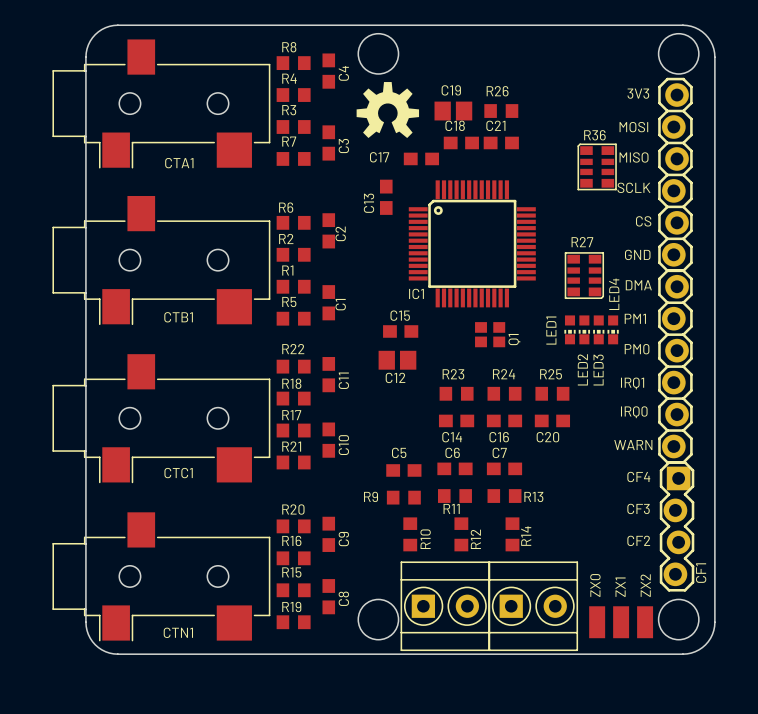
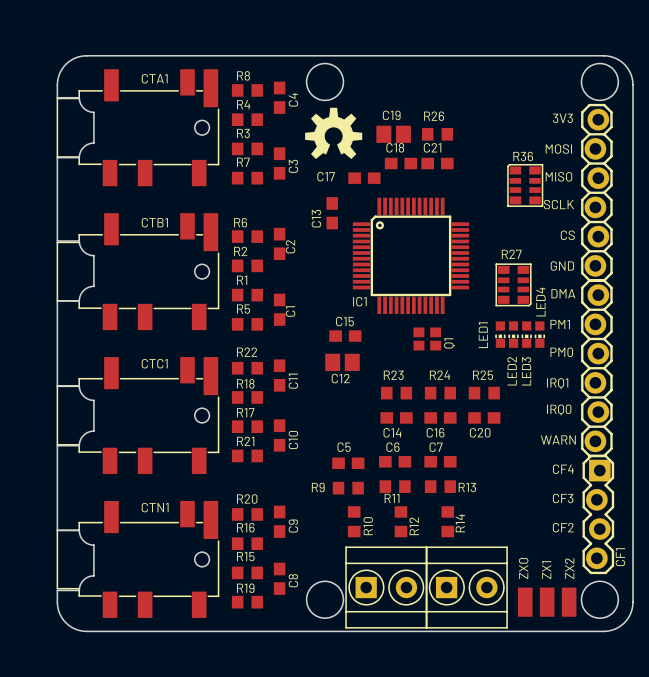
CTA1 footprint: [52, 39, 271, 169] -> [56, 69, 220, 187]
board edge: (85, 71) (85, 136) -> (57, 97) (79, 97) (83, 108) (93, 112) (93, 143) (83, 147) (79, 157) (57, 157)
CTA1 name position: CTA1 (179, 163) -> CTA1 (154, 78)
CTB1 footprint: [52, 195, 271, 326] -> [56, 213, 220, 331]
board edge: (85, 227) (85, 293) -> (57, 241) (79, 241) (83, 251) (93, 255) (93, 286) (83, 290) (79, 300) (57, 300)
CTB1 name position: CTB1 (178, 317) -> CTB1 (154, 222)
CTC1 footprint: [52, 354, 271, 484] -> [56, 357, 220, 475]
board edge: (85, 385) (85, 451) -> (57, 385) (79, 385) (83, 396) (93, 400) (93, 431) (83, 435) (79, 445) (57, 445)
CTC1 name position: CTC1 (178, 473) -> CTC1 (154, 363)
CTN1 footprint: [52, 512, 271, 642] -> [56, 500, 220, 618]
board edge: (85, 543) (85, 609) -> (57, 530) (79, 530) (83, 540) (93, 545) (93, 575) (83, 580) (79, 590) (57, 590)
CTN1 name position: CTN1 (178, 632) -> CTN1 (155, 507)

